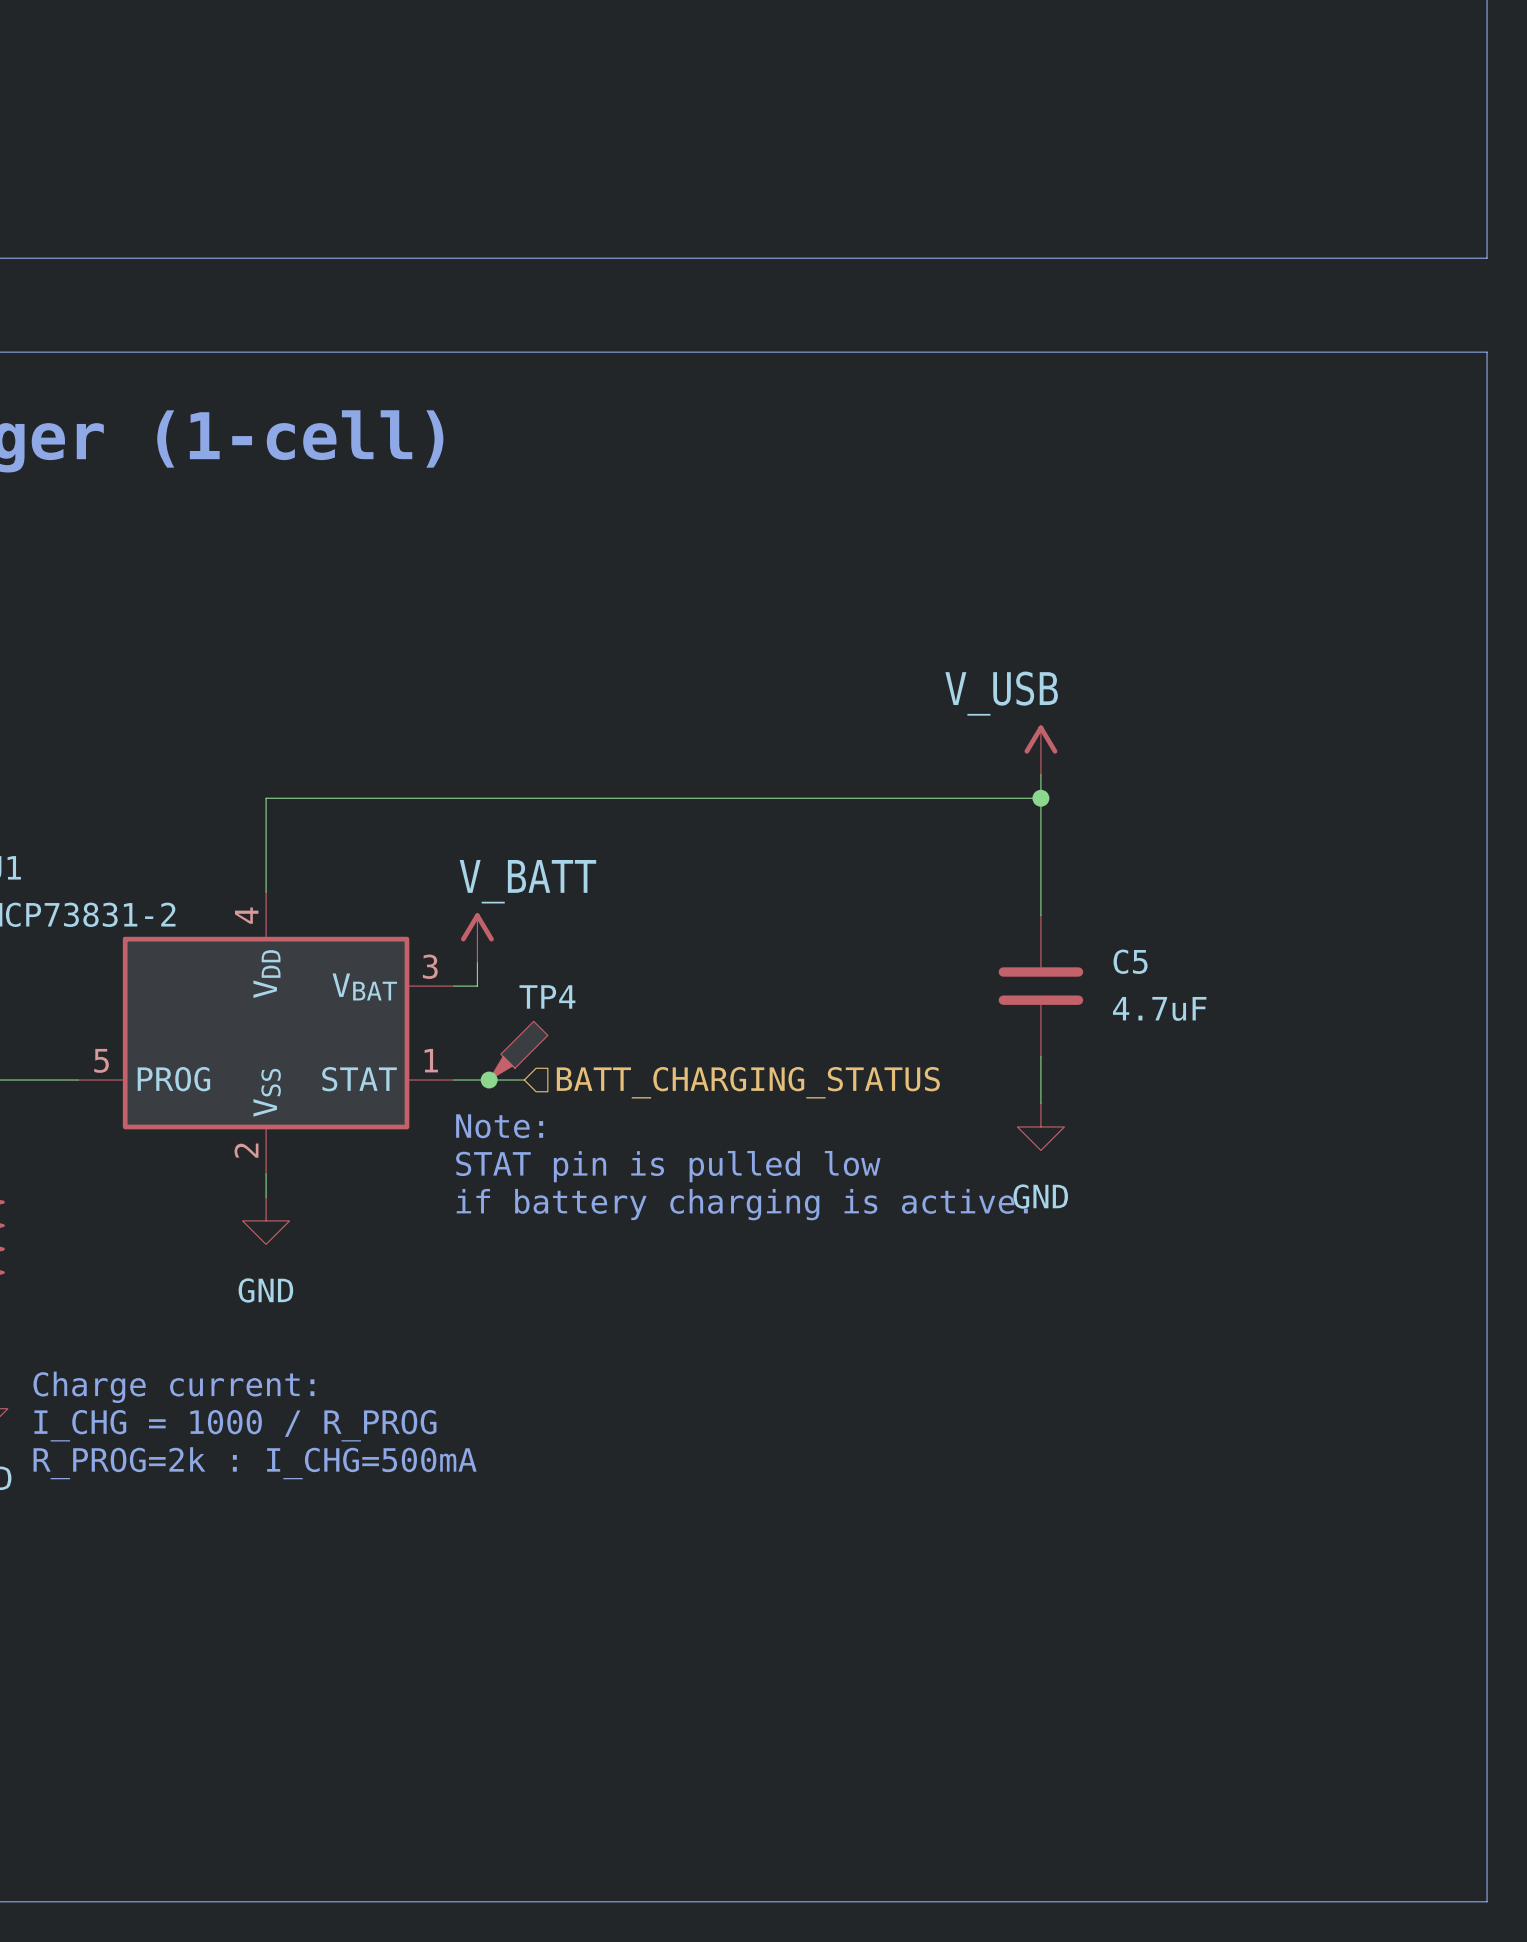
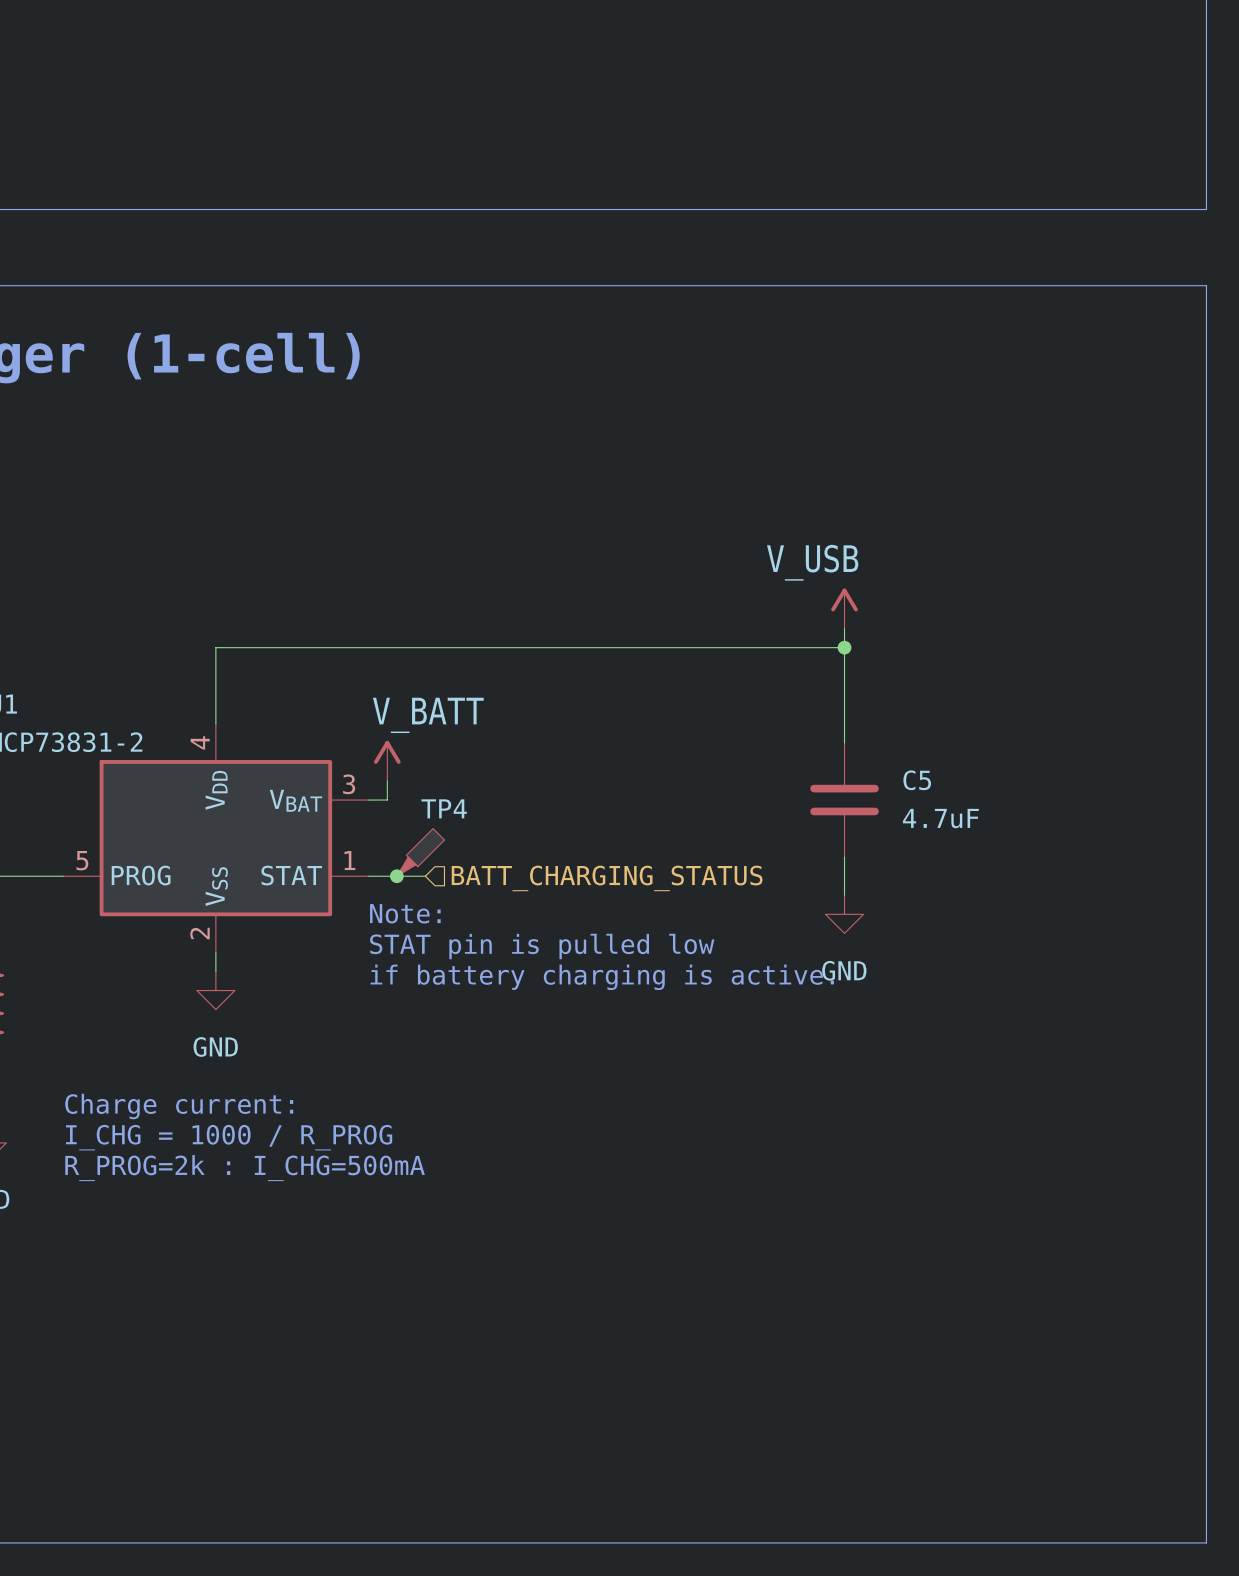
text position: Charge current: (173, 1387) -> Charge current: (179, 1106)
text position: I_CHG = 1000 / R_PROG (235, 1425) -> I_CHG = 1000 / R_PROG (229, 1137)
text position: R_PROG=2k : I_CHG=500mA (255, 1463) -> R_PROG=2k : I_CHG=500mA (245, 1168)

